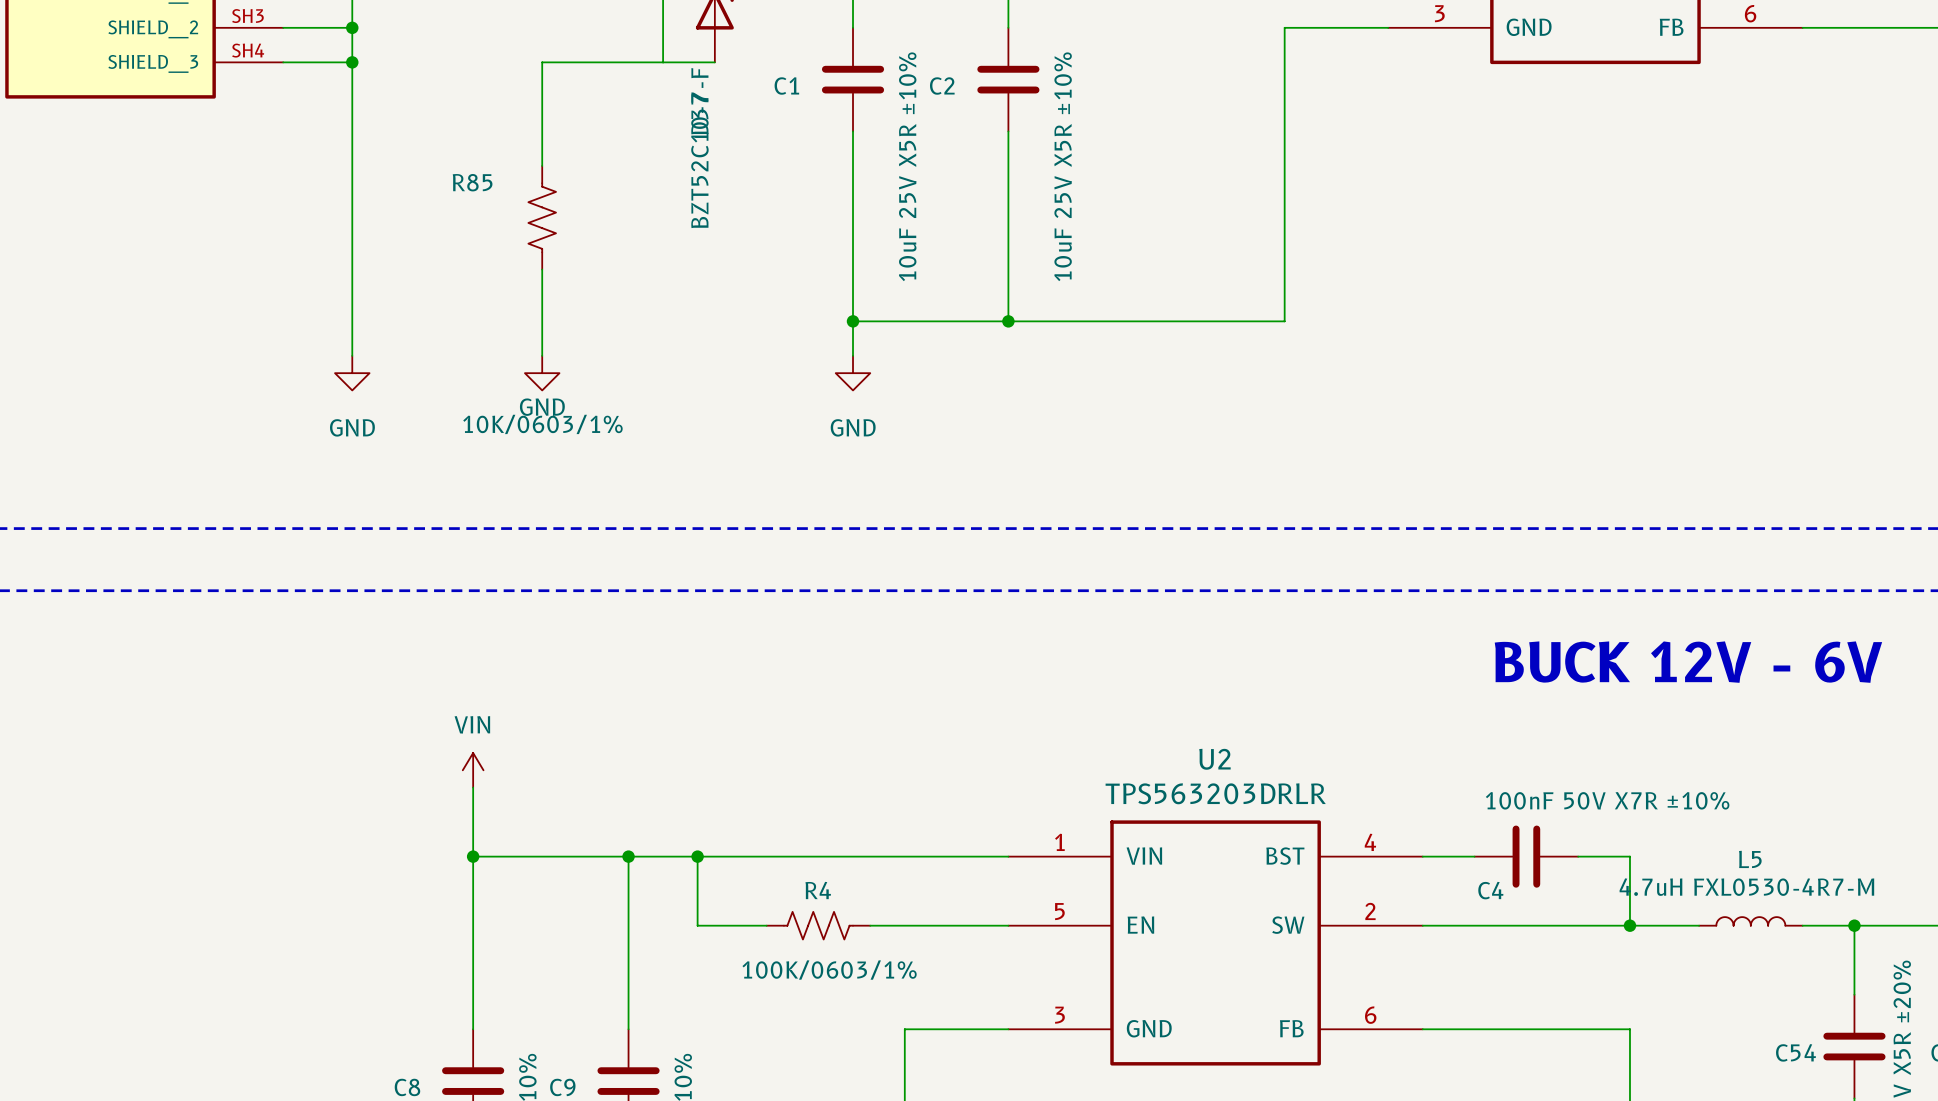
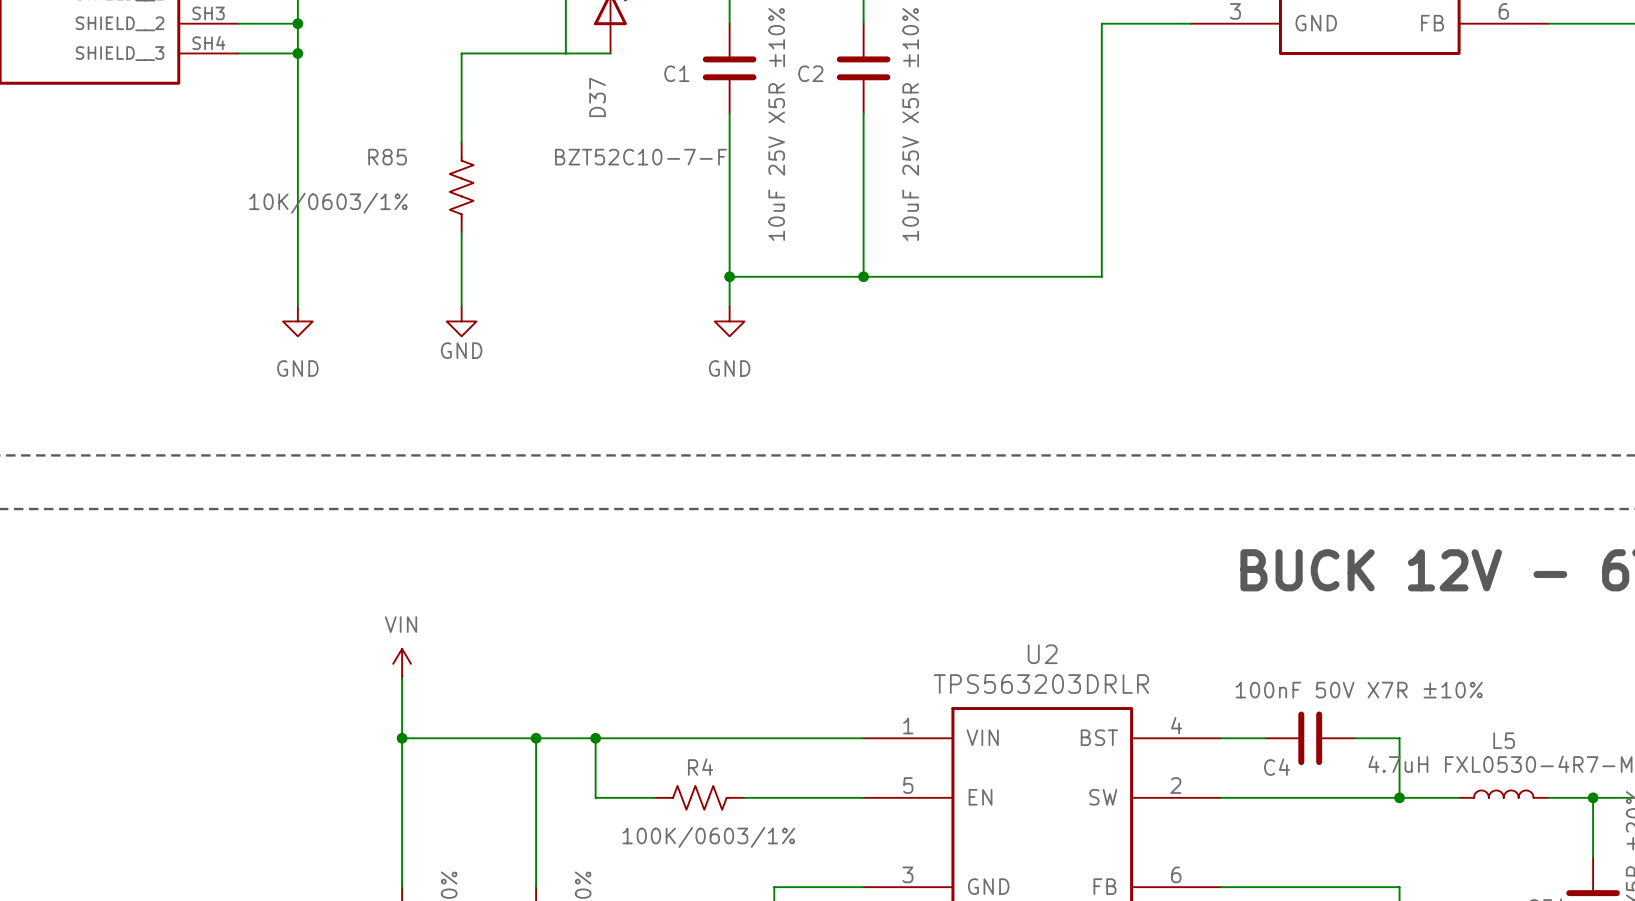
D37 value rotation: 0° (699, 148) -> 90° clockwise (641, 157)
R85 name position: R85 (472, 182) -> R85 (387, 157)
R85 value position: 10K/0603/1% (542, 424) -> 10K/0603/1% (328, 203)

